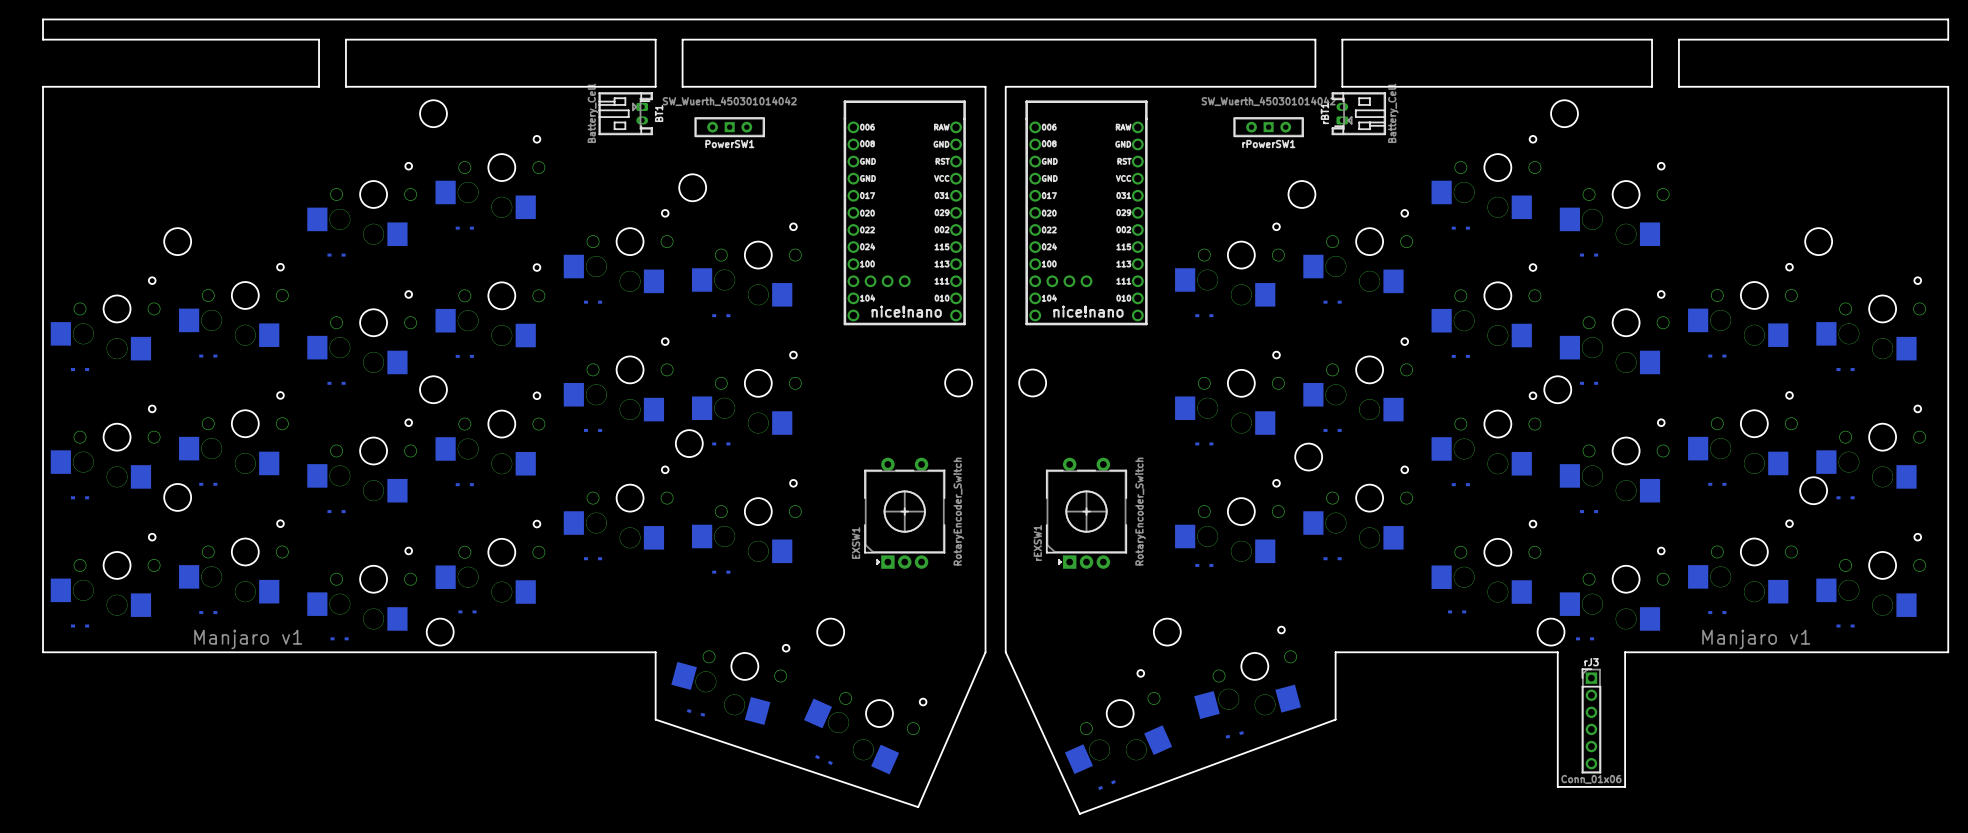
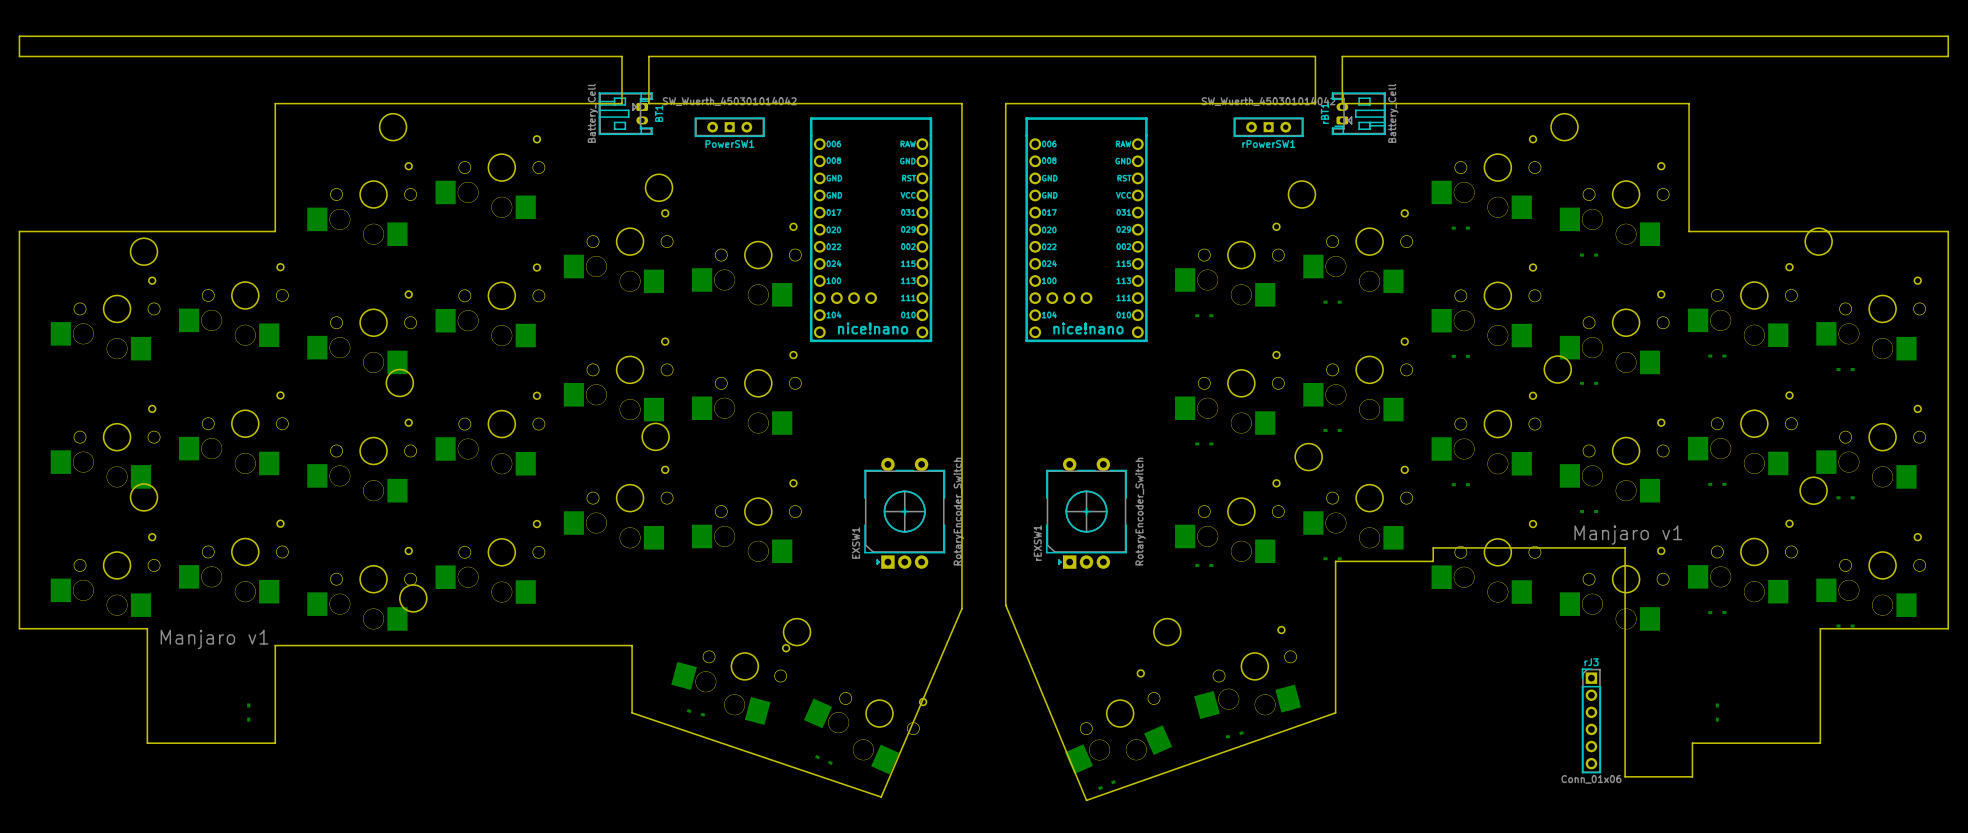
board edge: (1948, 36) (1948, 19) (43, 19) (43, 39) (319, 39) (319, 86) (43, 86) (43, 652) (655, 652) (655, 719) (918, 807) (985, 652) (985, 86) (682, 86) (682, 39) (1315, 39) (1315, 56) -> (1948, 36) (19, 36) (19, 56) (621, 56) (621, 103) (275, 103) (275, 231) (19, 231) (19, 628) (147, 628) (147, 743) (275, 743) (275, 645) (632, 645) (632, 712) (881, 797) (961, 608) (961, 103) (648, 103) (648, 56) (1315, 56)
board edge: (345, 39) (655, 39) (655, 86) (345, 86) (345, 39) -> none
board edge: (1948, 39) (1678, 39) (1678, 86) (1948, 86) (1948, 231) -> (1342, 86) (1342, 103) (1689, 103) (1689, 231) (1948, 231)
board edge: (1342, 56) (1342, 39) (1652, 39) (1652, 86) (1342, 86) -> (1342, 56) (1948, 56) (1948, 39)
board edge: (1315, 86) (1005, 86) (1005, 103) -> (1315, 86) (1315, 103) (1005, 103)
round board edge position: (433, 113) -> (393, 127)
round board edge position: (1564, 113) -> (1564, 127)
round board edge position: (692, 187) -> (659, 187)
part position: (904, 212) -> (871, 229)
part position: (1086, 212) -> (1086, 229)
part: (464, 228) -> none
round board edge position: (177, 241) -> (144, 251)
part: (336, 255) -> none
part: (593, 302) -> none
part: (721, 315) -> none
part: (208, 356) -> none
part: (464, 356) -> none
part: (80, 369) -> none
round board edge: [944, 369, 973, 397] -> none
round board edge: [1019, 369, 1047, 397] -> none
part: (336, 383) -> none
round board edge position: (433, 389) -> (399, 382)
round board edge position: (1557, 389) -> (1557, 369)
part: (593, 430) -> none
round board edge position: (689, 443) -> (655, 436)
part: (721, 443) -> none
part: (208, 484) -> none
part: (464, 484) -> none
part: (80, 497) -> none
round board edge position: (177, 497) -> (144, 497)
part: (336, 511) -> none
part: (593, 558) -> none
part: (721, 572) -> none
board edge: (1005, 605) (1005, 652) (1079, 813) (1335, 719) (1335, 712) -> (1005, 605) (1086, 800) (1335, 712)
part: (467, 611) -> none
part: (1457, 611) -> none
part: (208, 612) -> none
round board edge: [1537, 618, 1565, 646] -> none
part: (80, 626) -> none
board edge: (1948, 628) (1948, 652) (1625, 652) -> (1948, 628) (1820, 628) (1820, 743) (1692, 743) (1692, 776) (1625, 776)
round board edge position: (440, 632) -> (413, 598)
round board edge position: (830, 632) -> (797, 632)
part: (339, 638) -> none
part: (1585, 638) -> none
text position: Manjaro v1 (248, 639) -> Manjaro v1 (214, 639)
text position: Manjaro v1 (1756, 639) -> Manjaro v1 (1628, 535)
board edge: (1335, 652) (1557, 652) (1557, 786) (1625, 786) (1625, 776) -> (1335, 652) (1335, 561) (1433, 561) (1433, 547) (1625, 547) (1625, 652)
part: none -> (248, 712)
part: none -> (1717, 712)

